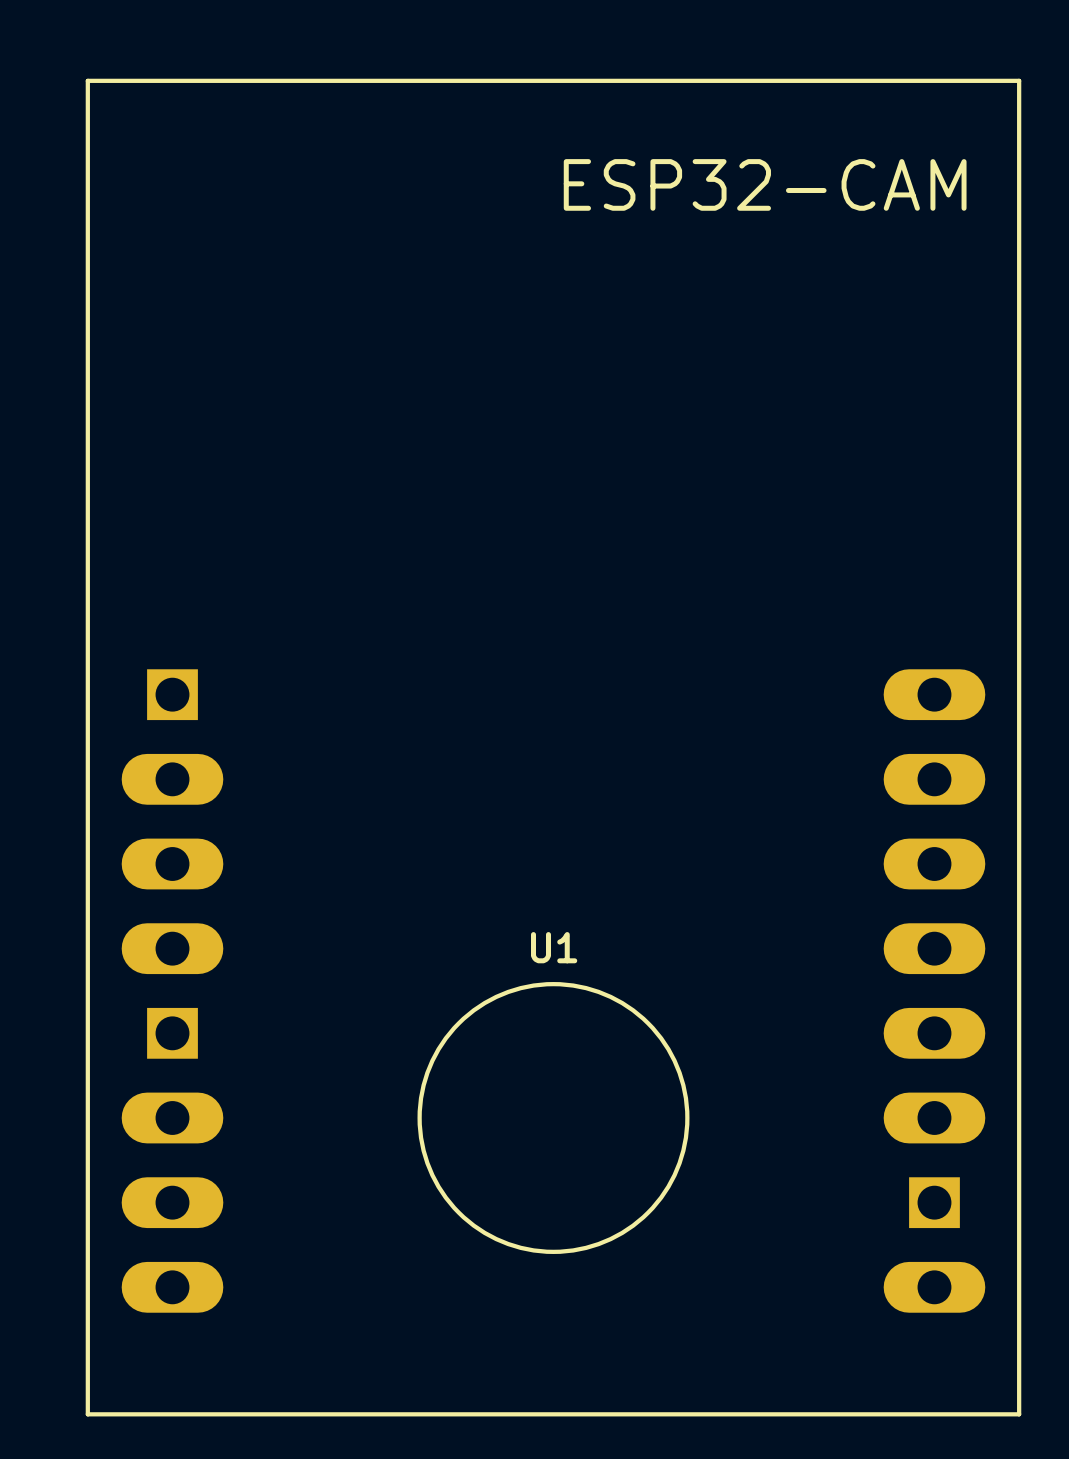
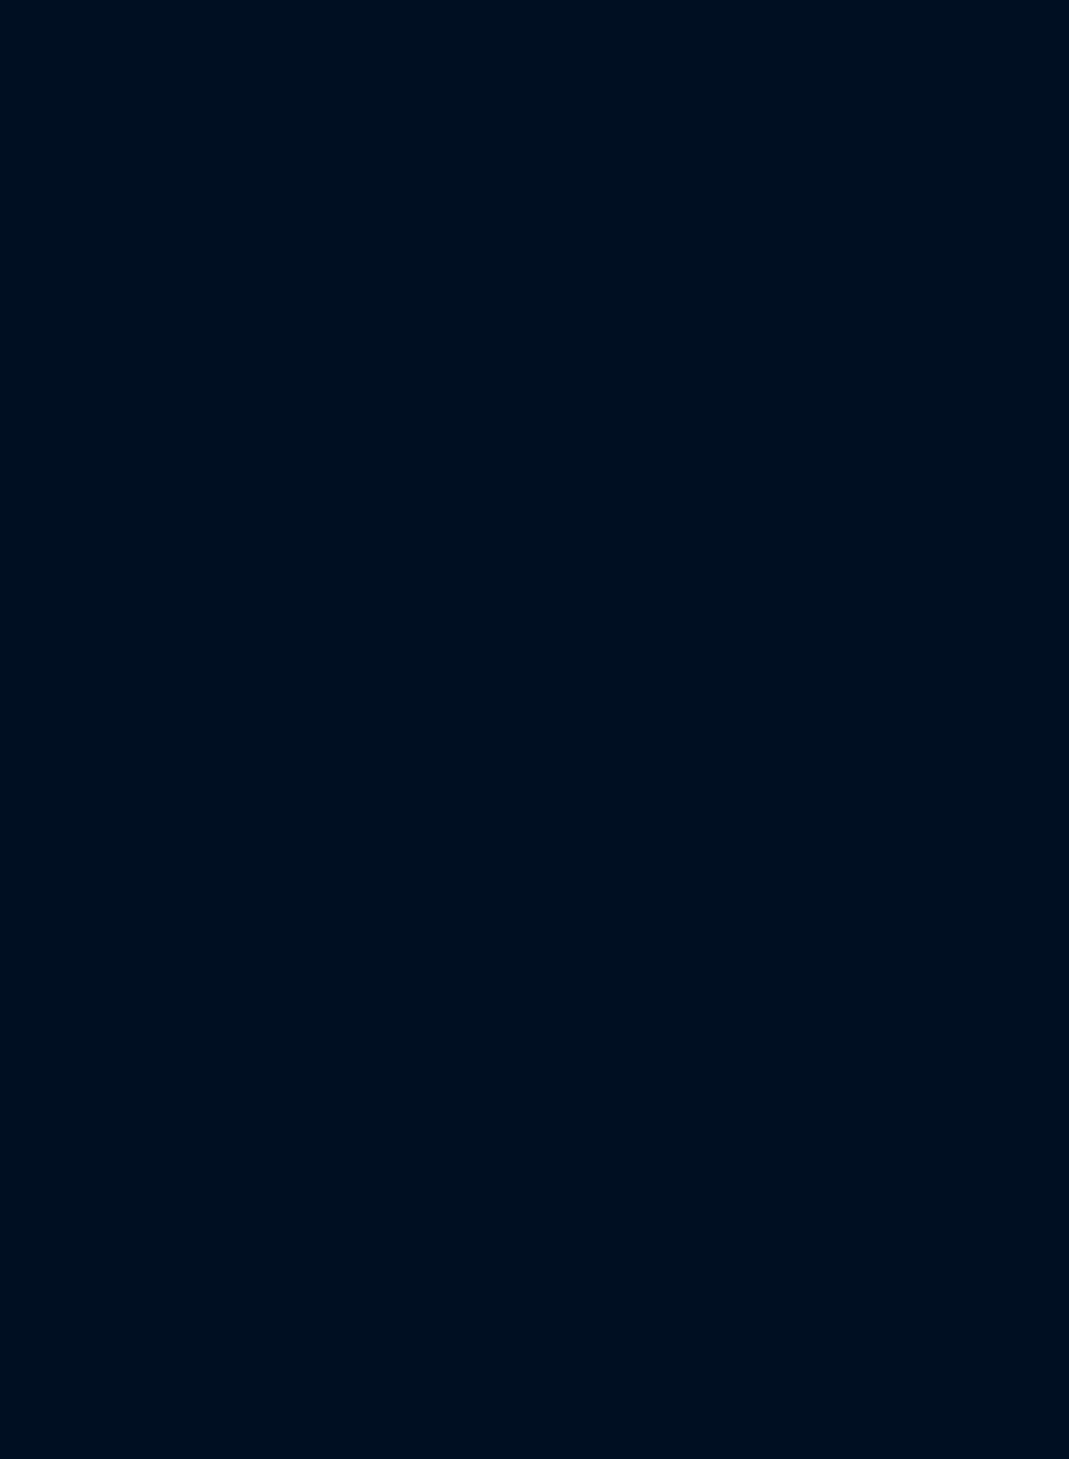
U1: (553, 747) -> none

